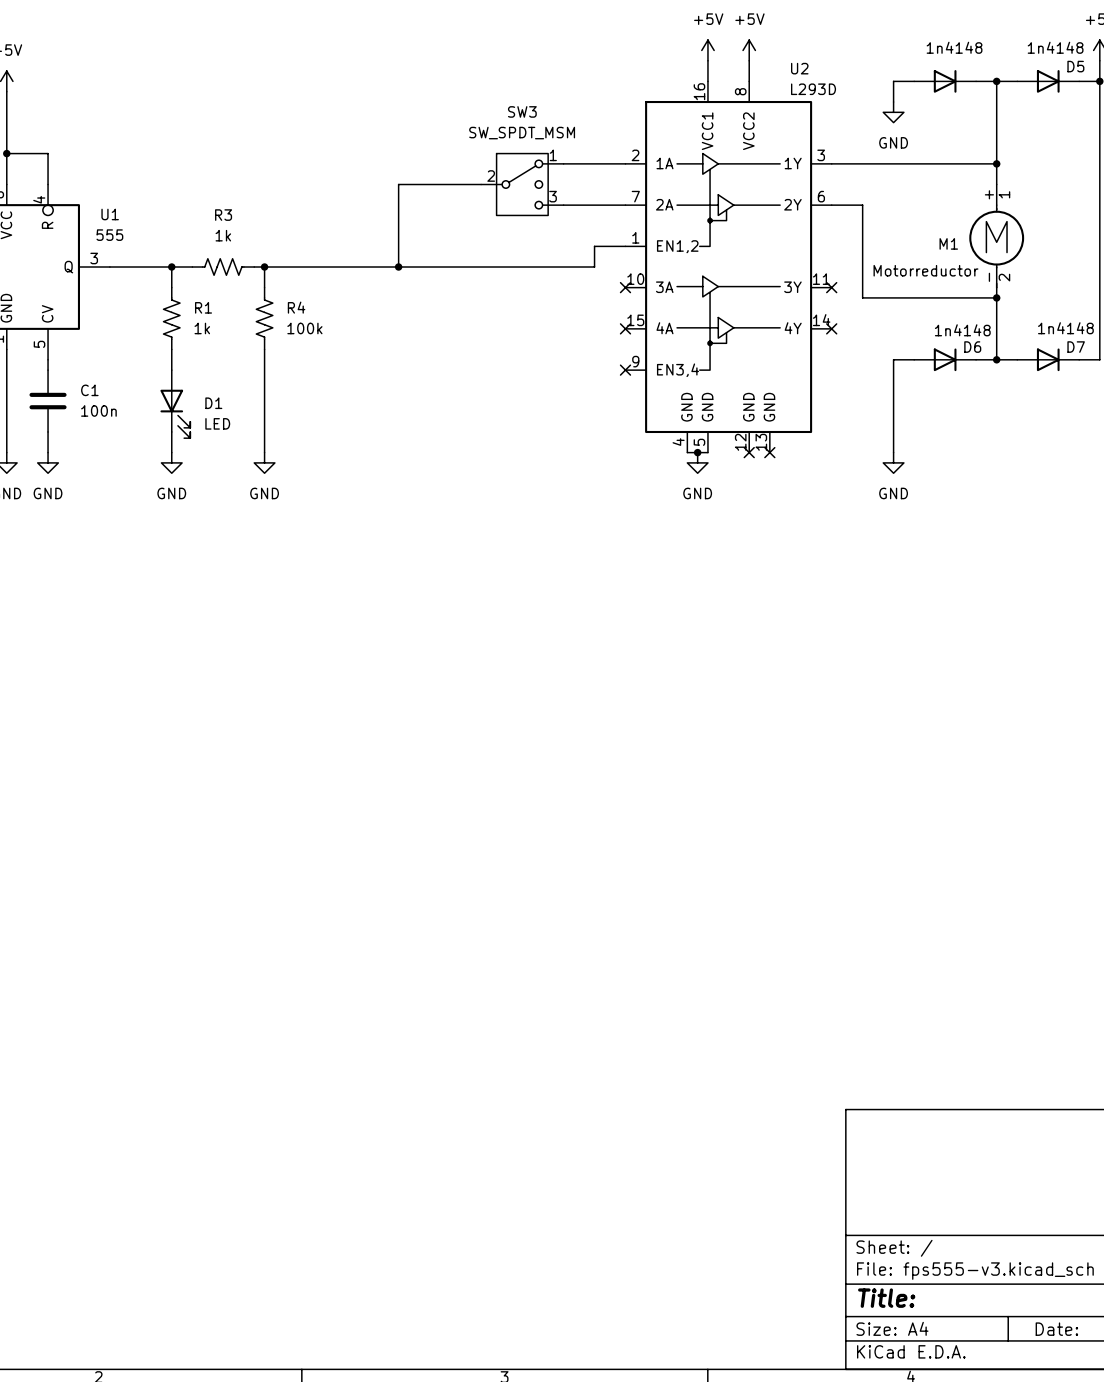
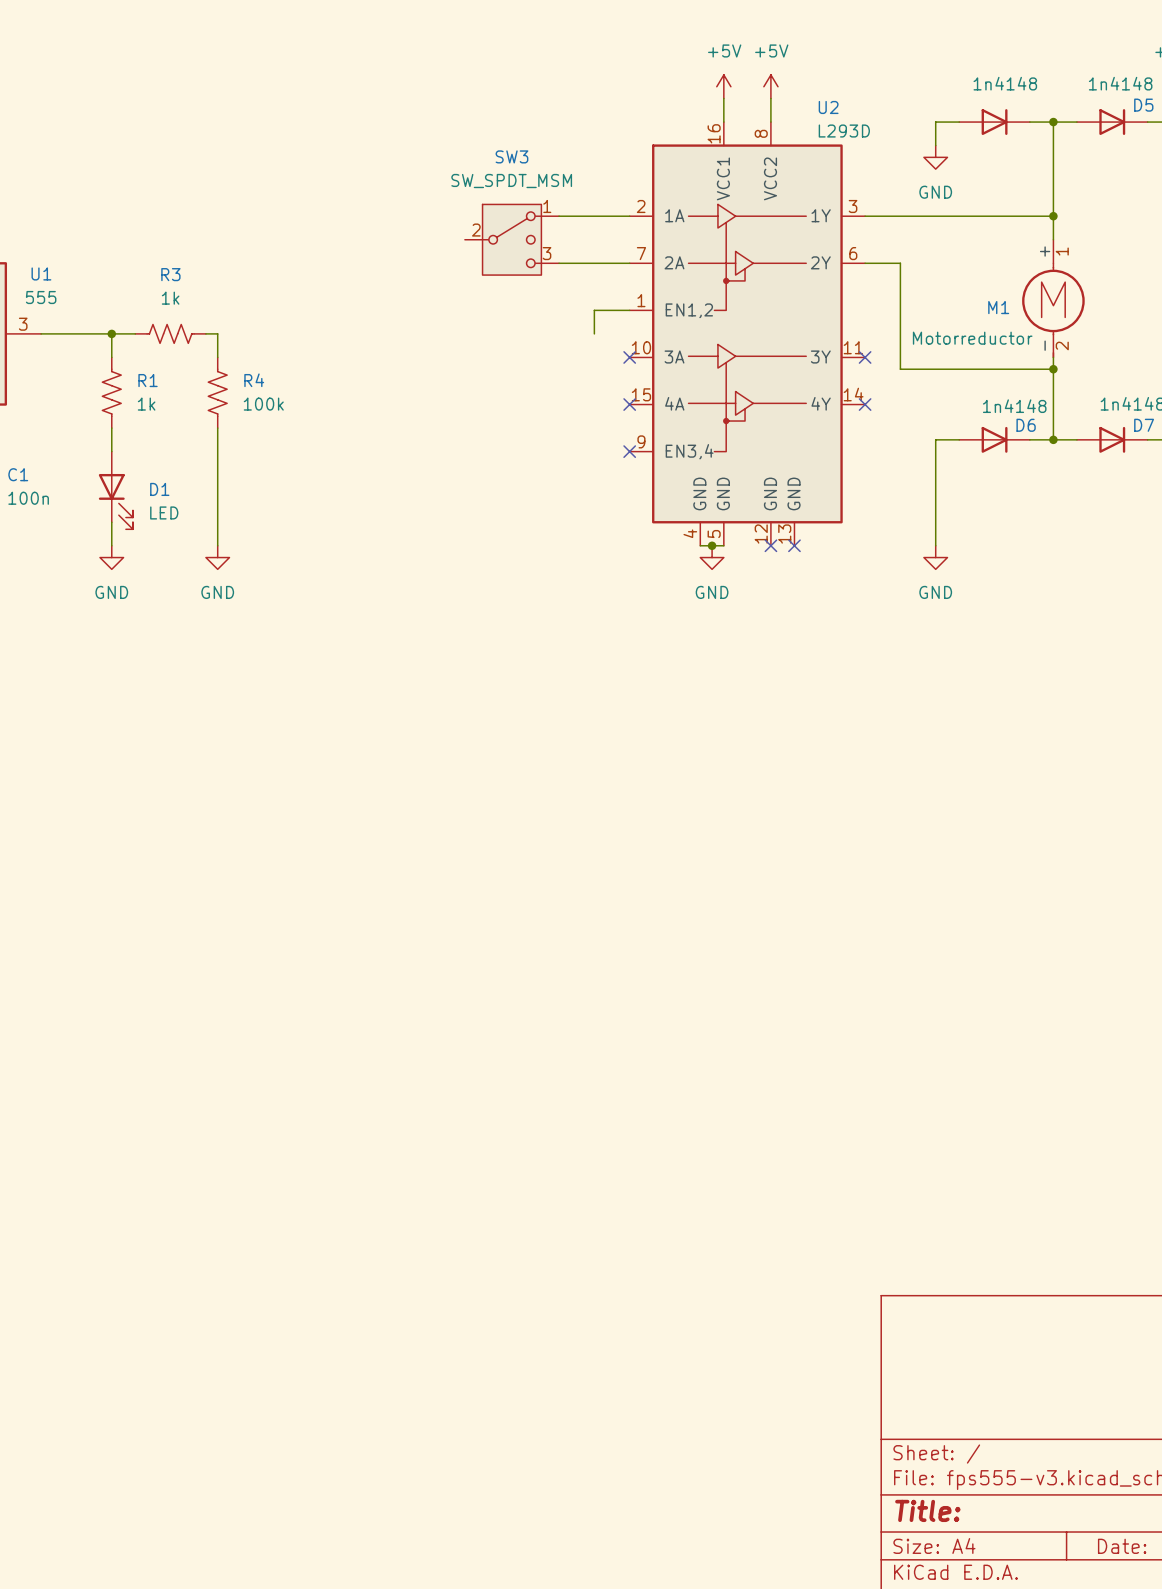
wire: (481, 184) (398, 184) (398, 267) -> none
wire: (264, 267) (594, 267) -> none
junction: (264, 267) -> none
junction: (398, 267) -> none

